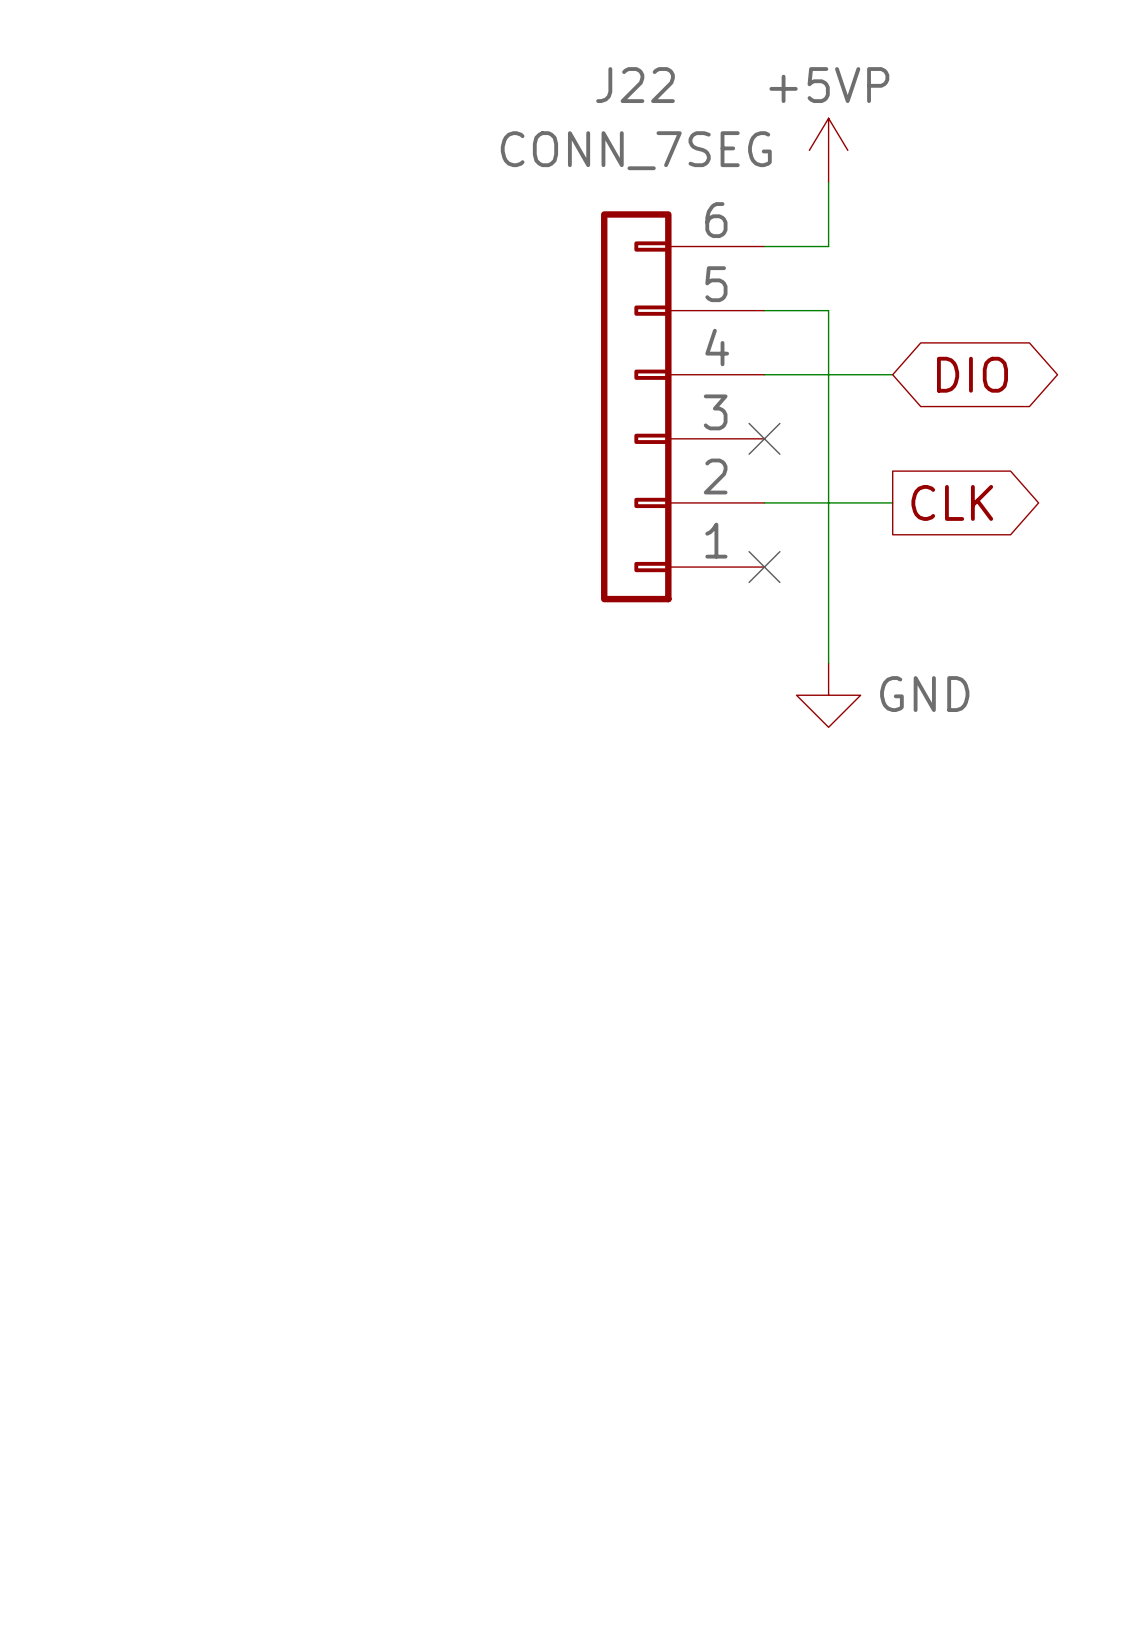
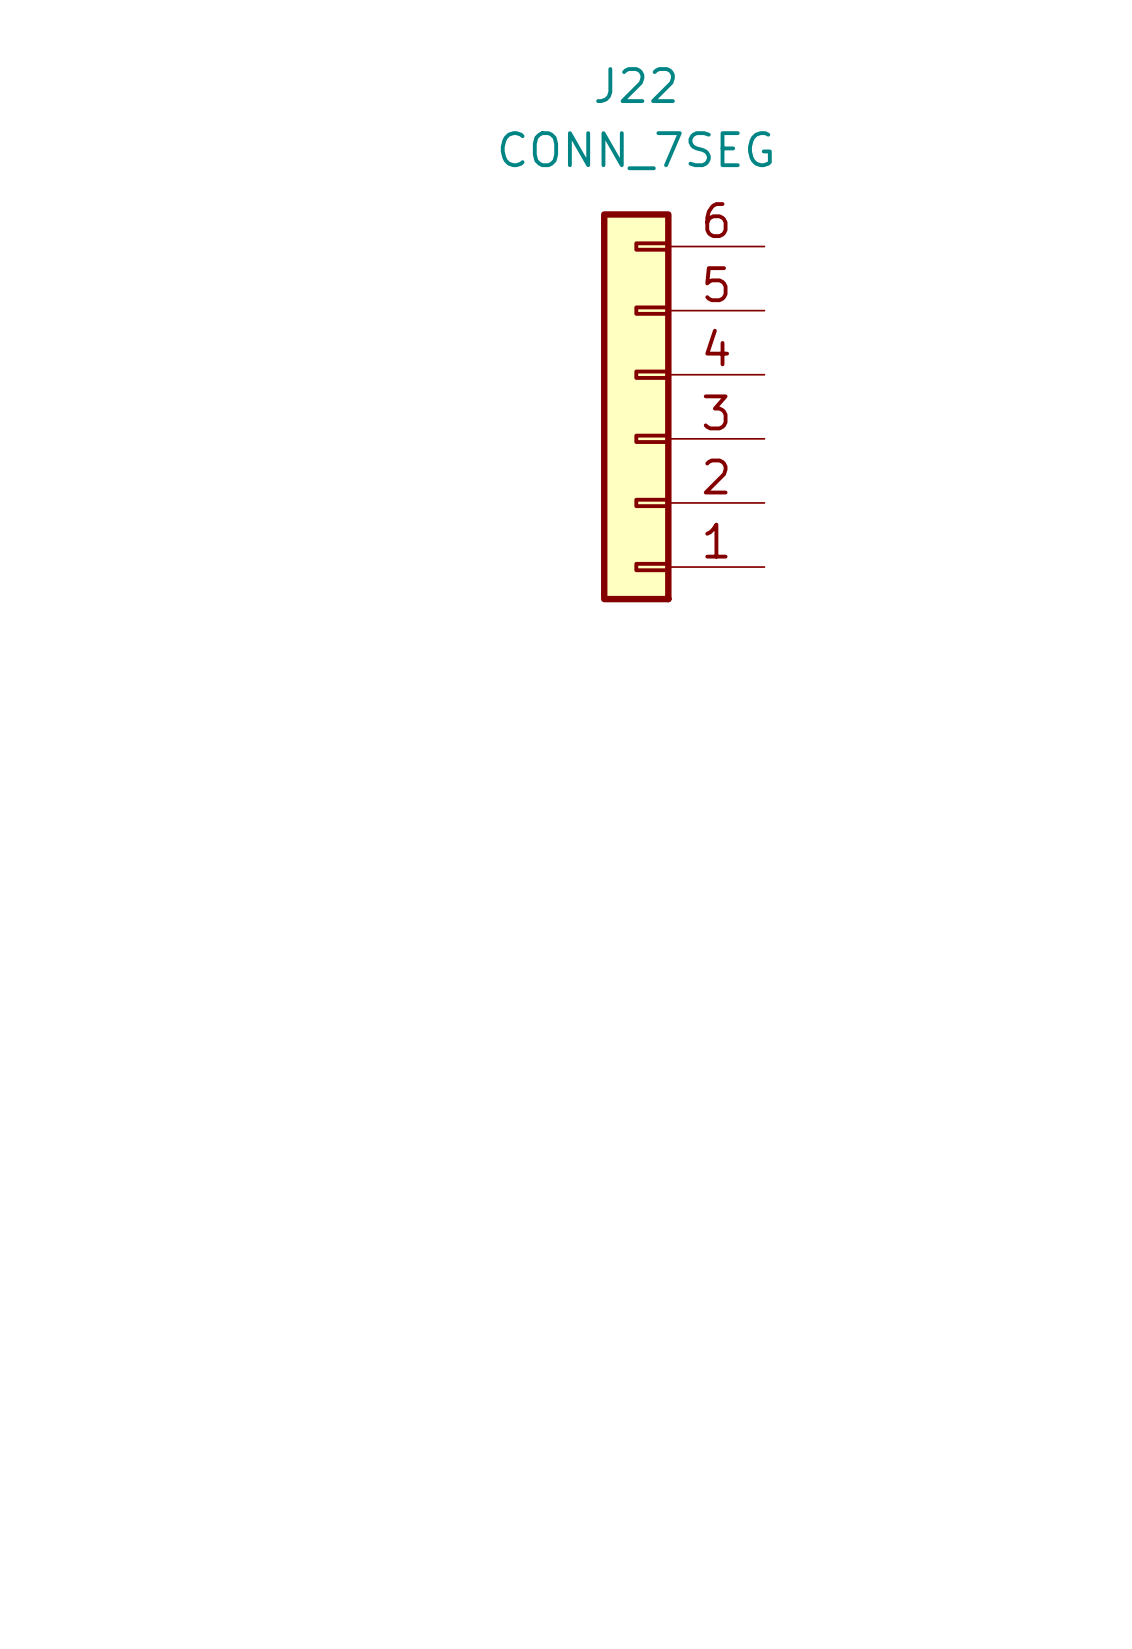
power symbol: +5VP (828, 150) -> none
wire: (828, 182) (828, 246) (764, 246) -> none
wire: (764, 310) (828, 310) (828, 663) -> none
wire: (764, 374) (892, 374) -> none
global label: DIO (972, 374) -> none
no-connect mark: (764, 438) -> none
wire: (764, 502) (892, 502) -> none
global label: CLK (952, 502) -> none
no-connect mark: (764, 567) -> none
power symbol: GND (828, 695) -> none

